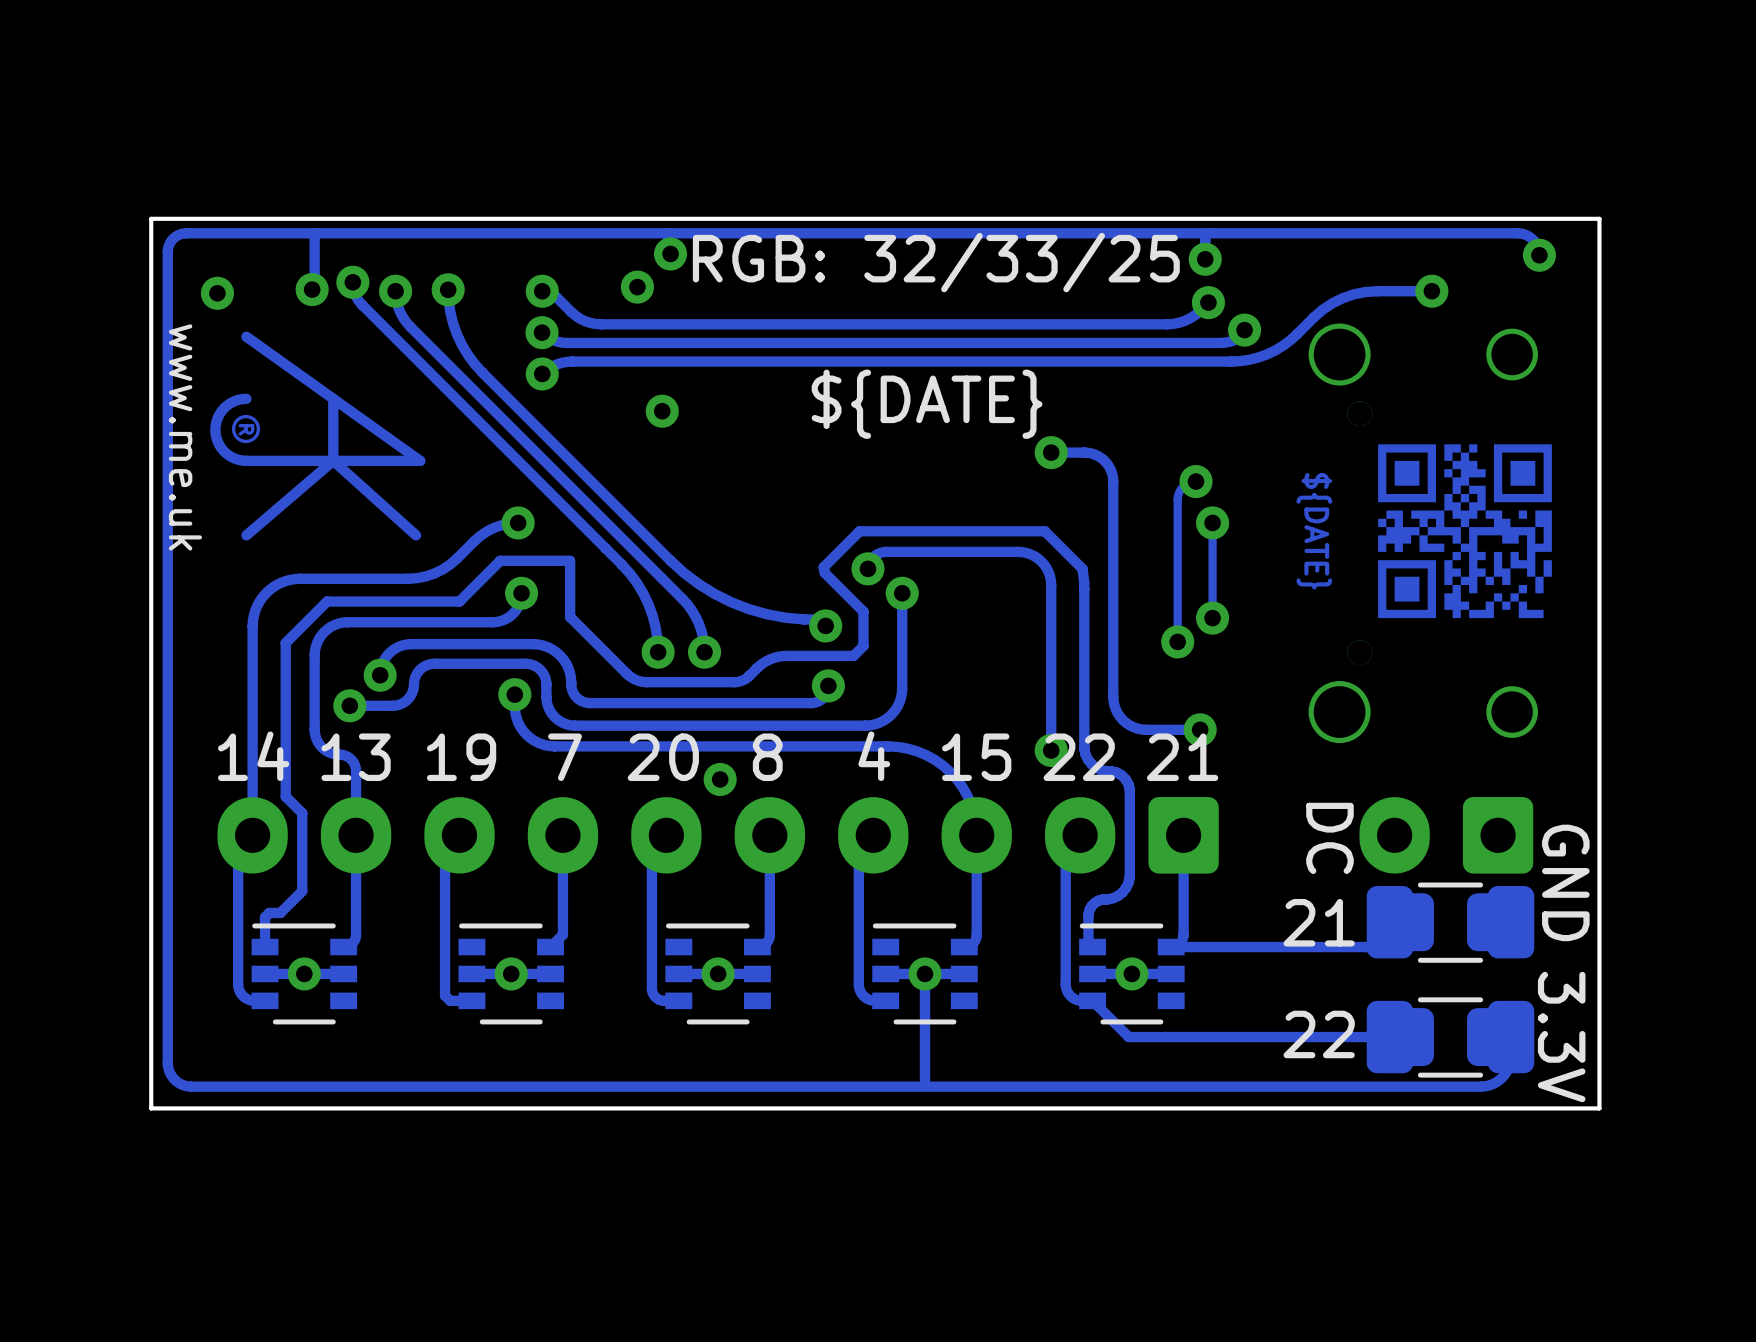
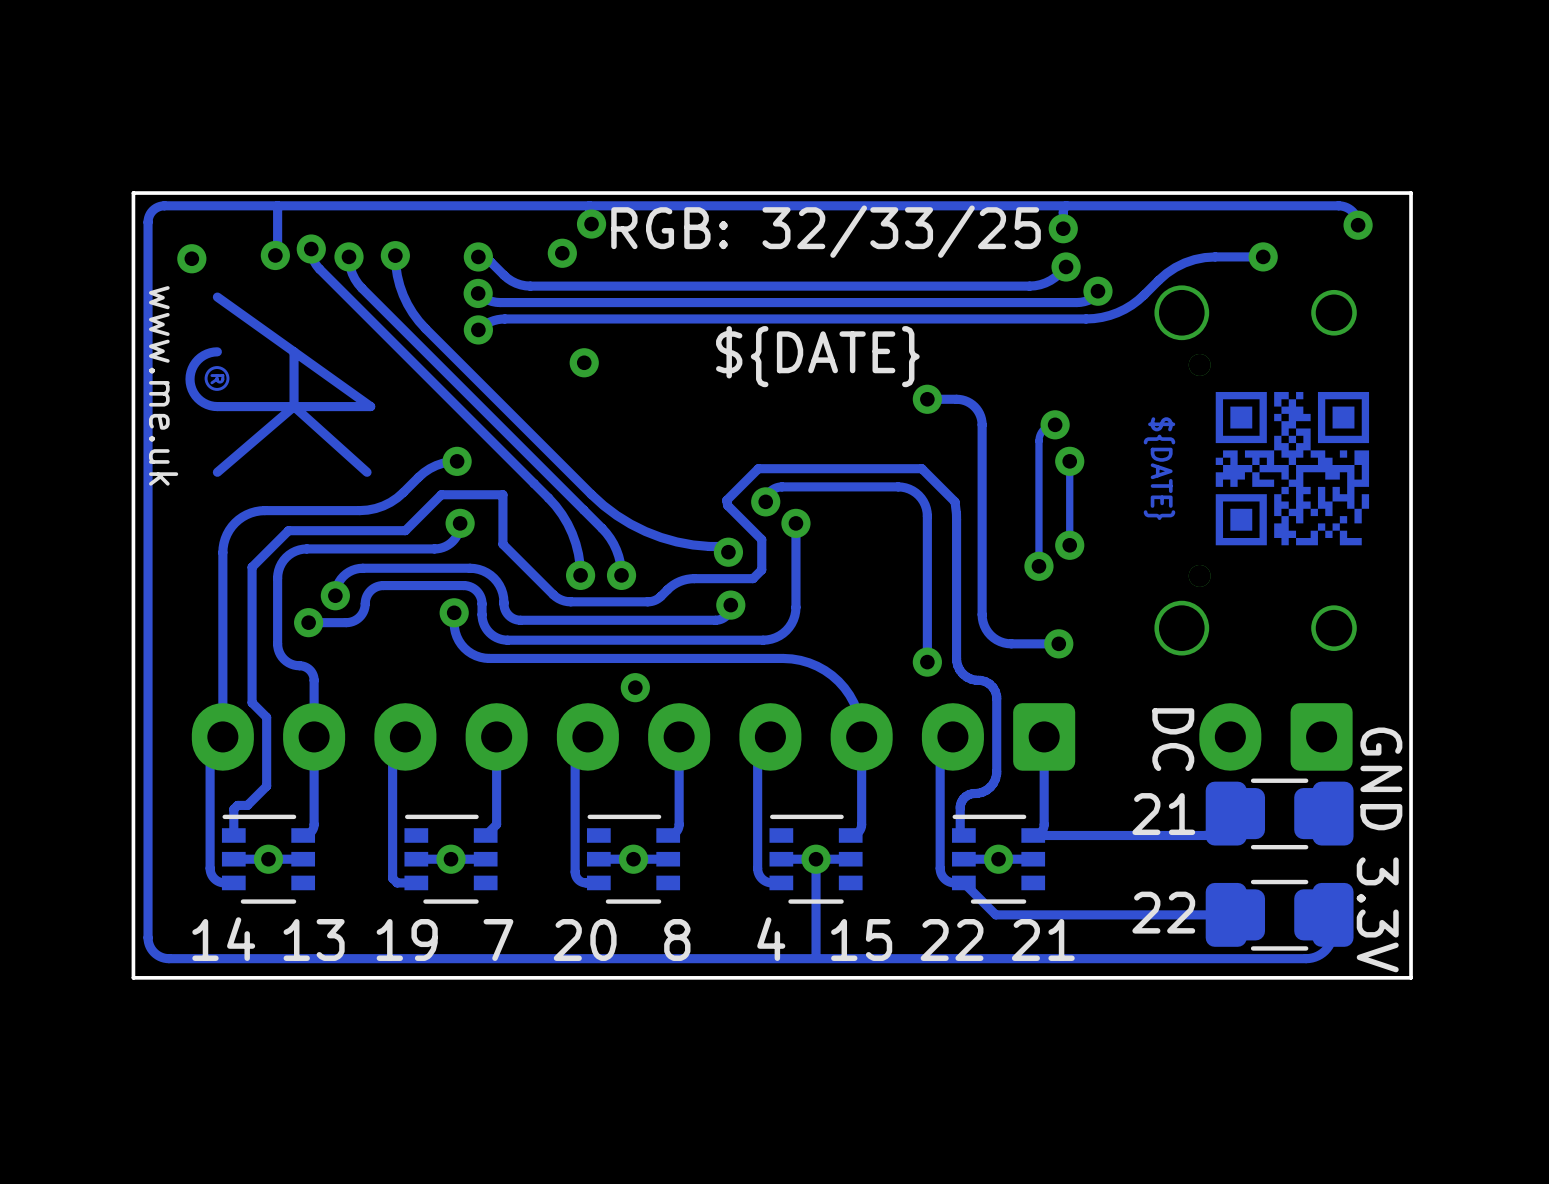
text position: 14 (253, 756) -> 14 (223, 939)
text position: 4 (874, 756) -> 4 (771, 939)
text position: 13 (356, 757) -> 13 (314, 939)
text position: 19 (461, 757) -> 19 (407, 939)
text position: 7 (565, 757) -> 7 (498, 939)
text position: 20 (663, 757) -> 20 (585, 939)
text position: 8 (767, 757) -> 8 (677, 939)
text position: 15 (976, 757) -> 15 (861, 939)
text position: 22 (1079, 757) -> 22 (952, 939)
text position: 21 (1182, 757) -> 21 (1043, 939)

